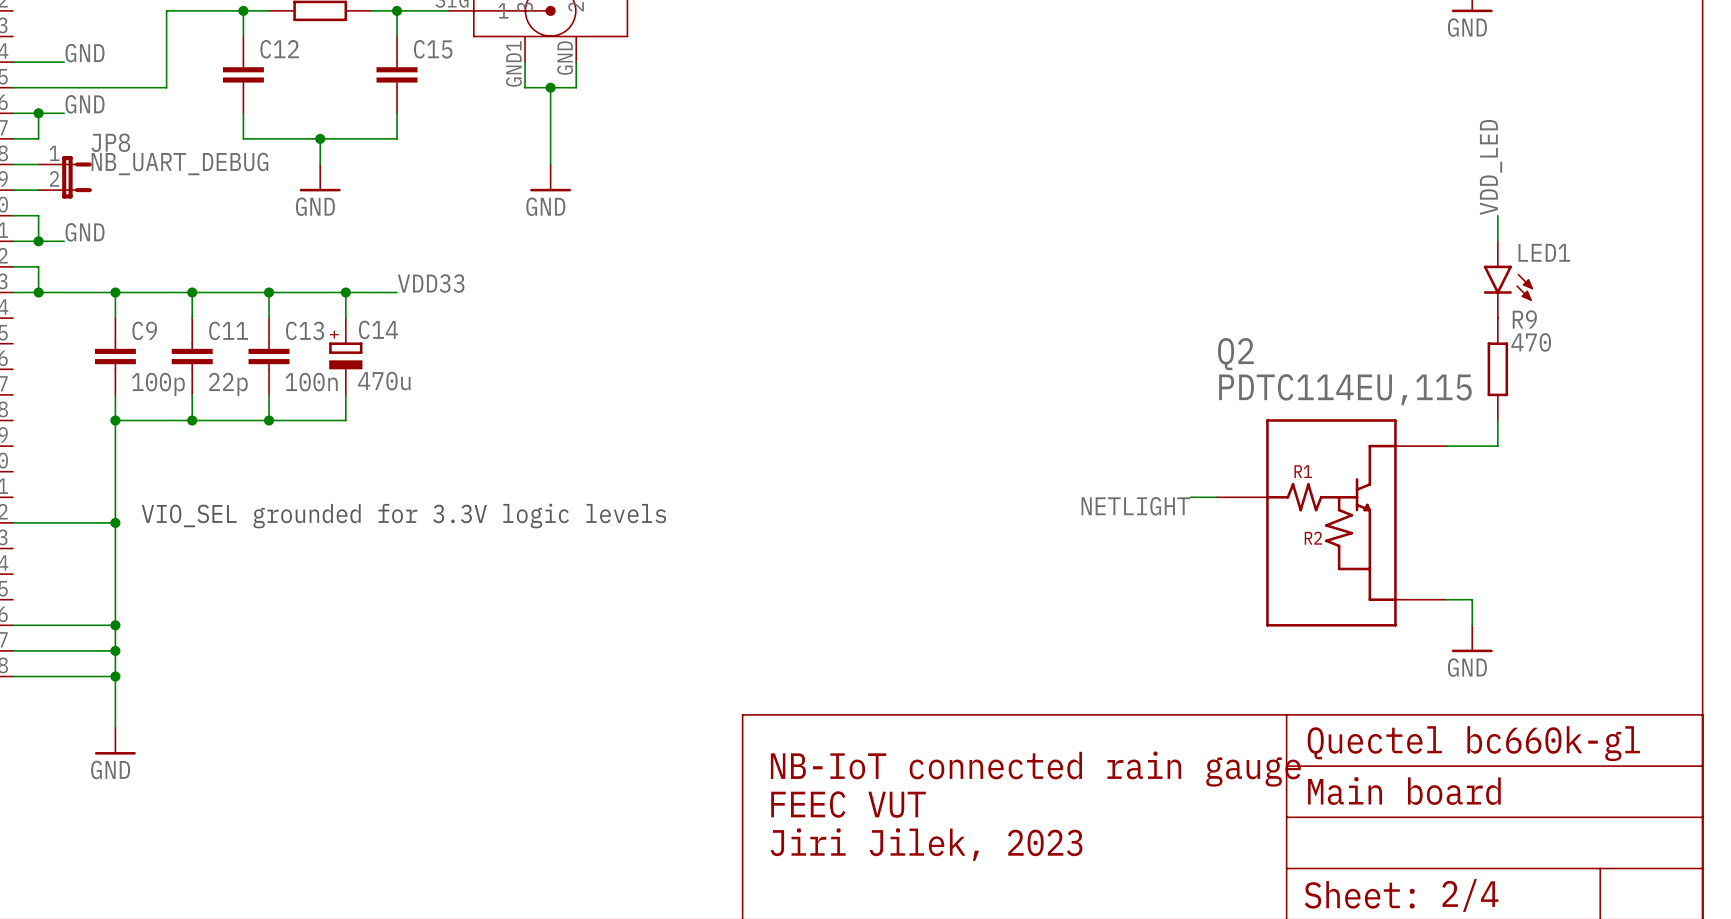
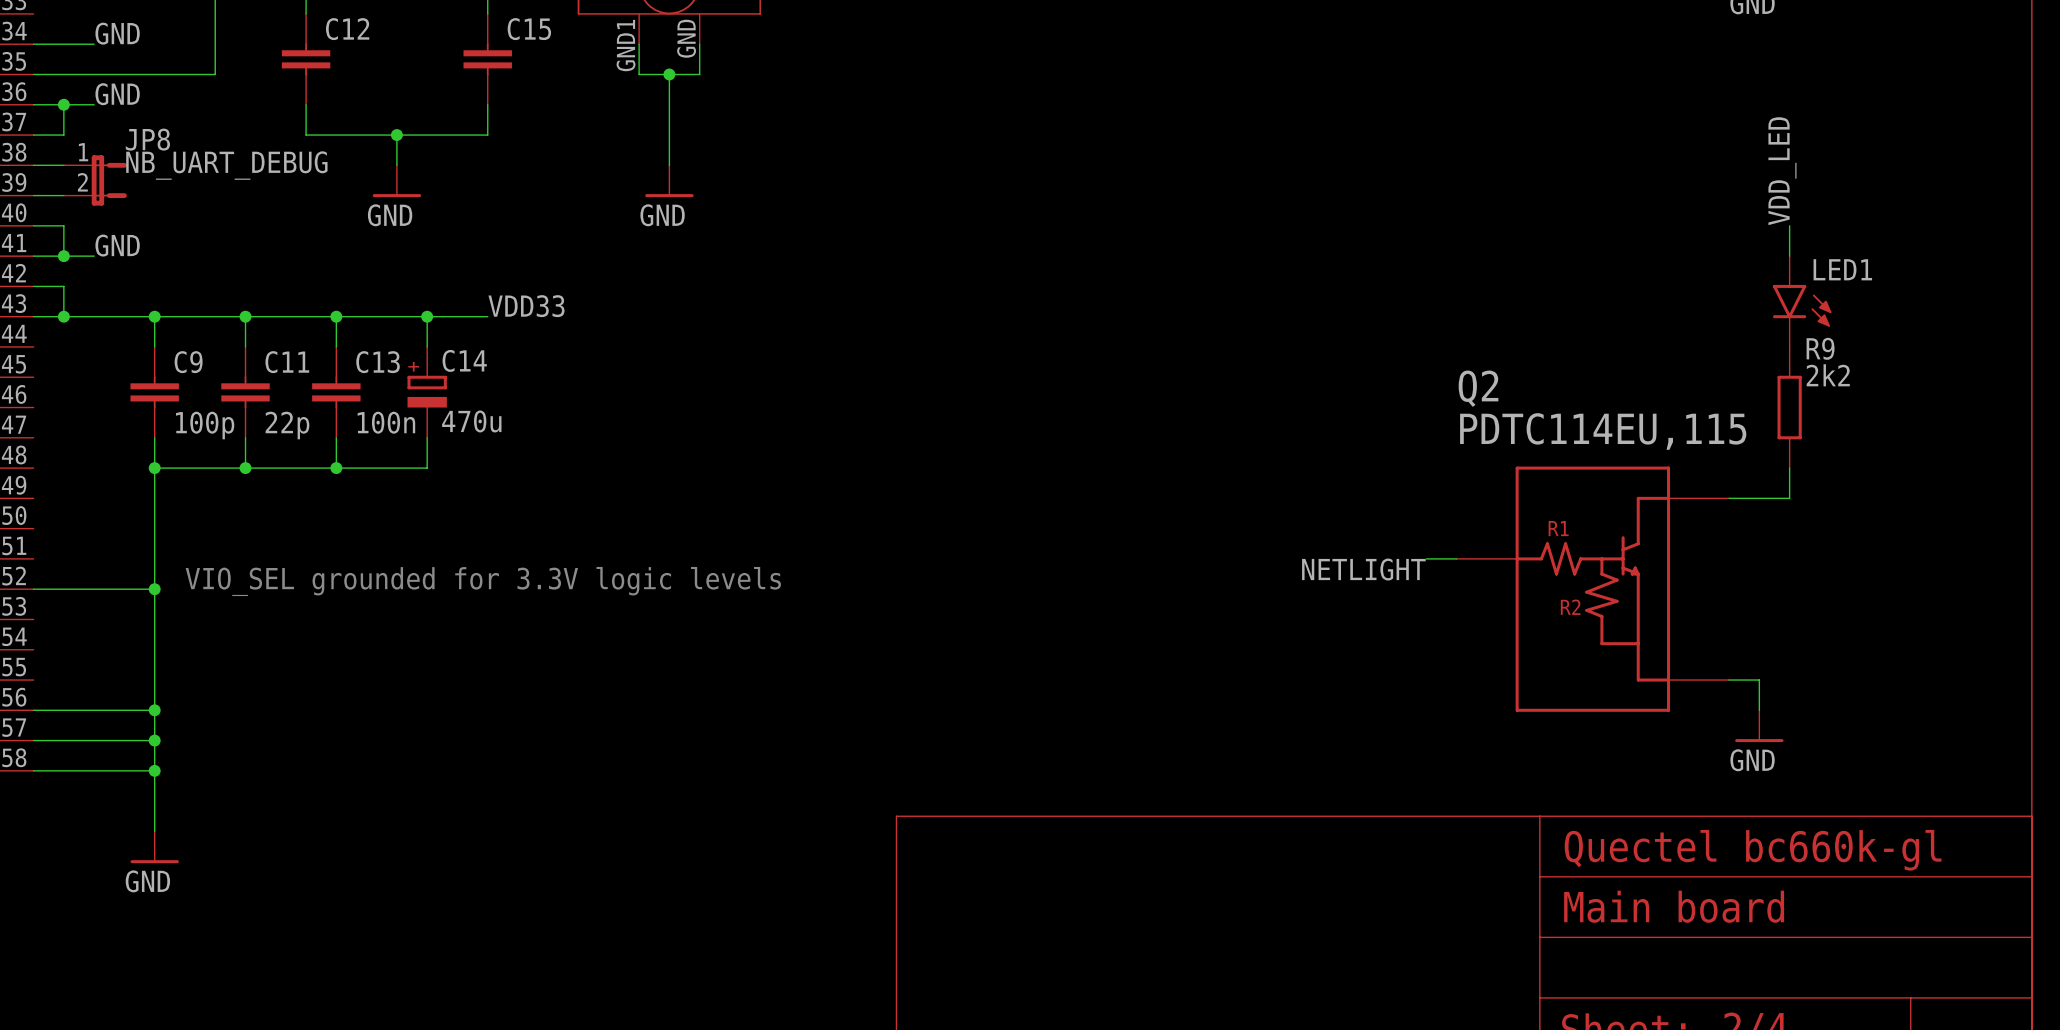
R9 value: 470 (1531, 342) -> 2k2 (1828, 375)
text: NB-IoT connected rain gauge (1035, 769) -> none
text: FEEC VUT (848, 804) -> none
text: Jiri Jilek, 2023 (926, 844) -> none

